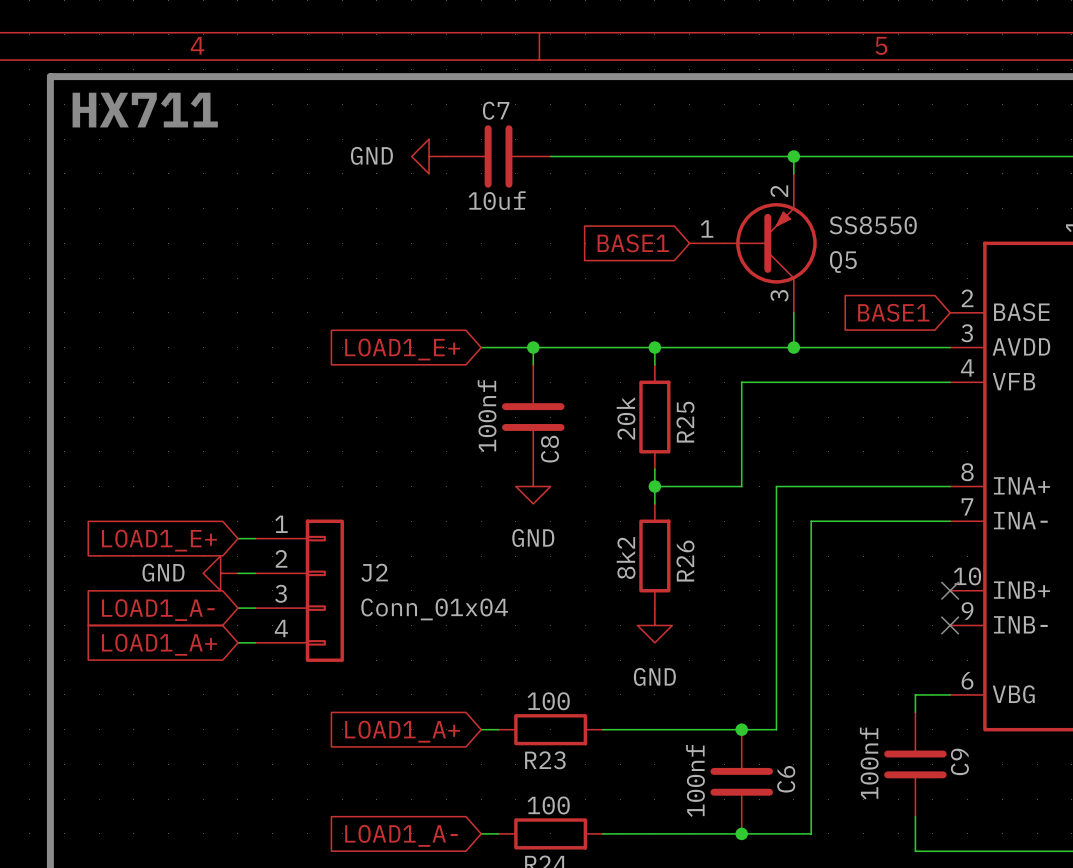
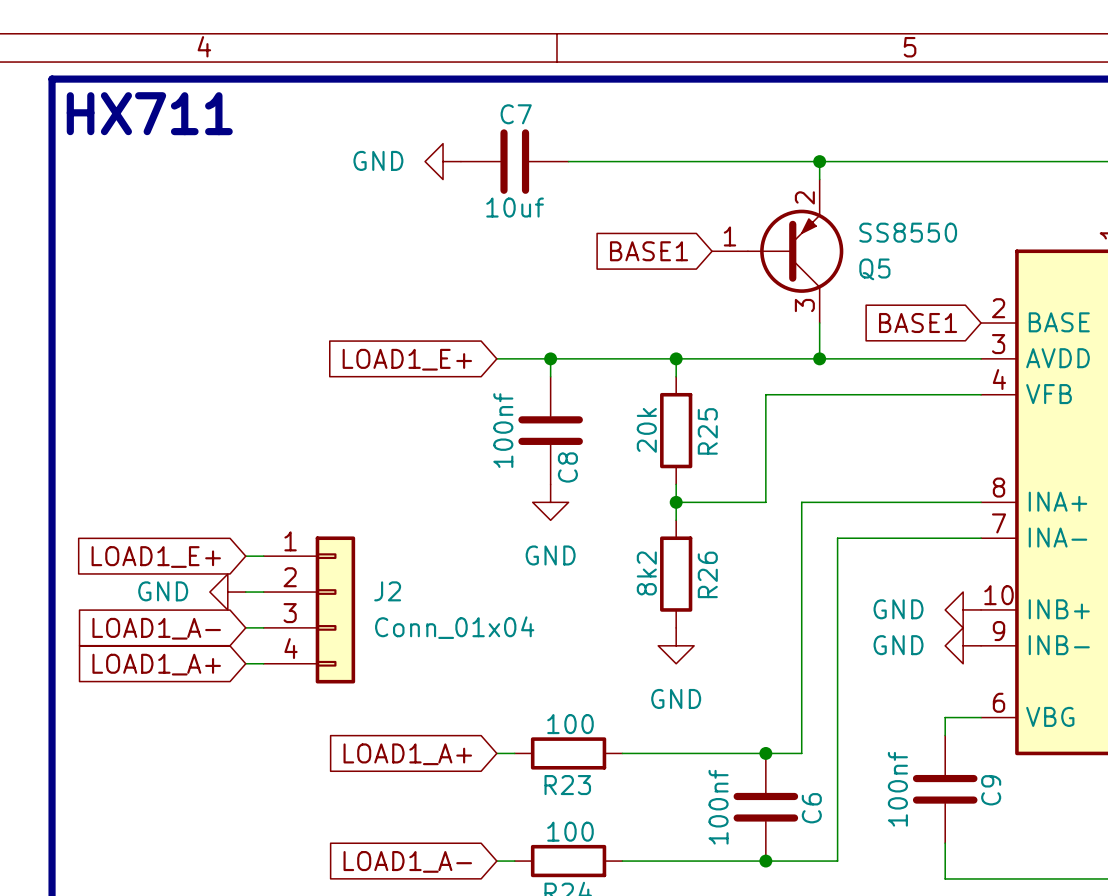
power symbol: none -> GND (963, 609)
no-connect mark: (950, 590) -> none
power symbol: none -> GND (963, 645)
no-connect mark: (950, 625) -> none

